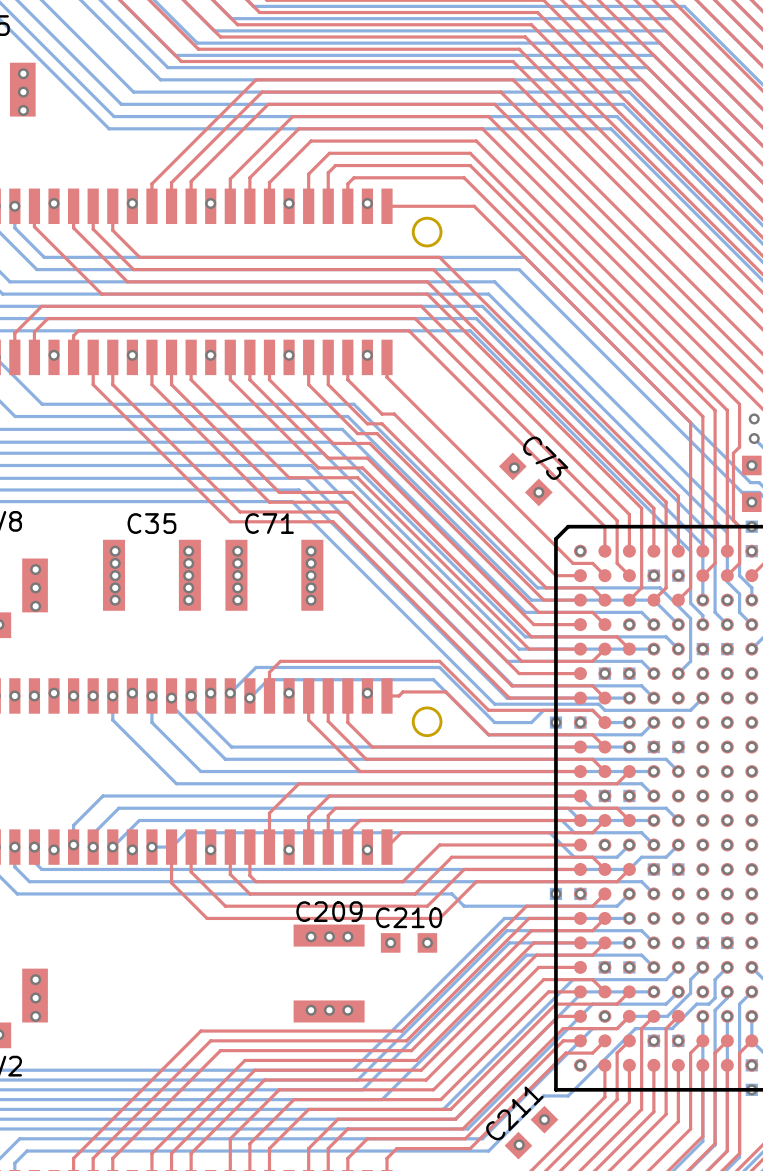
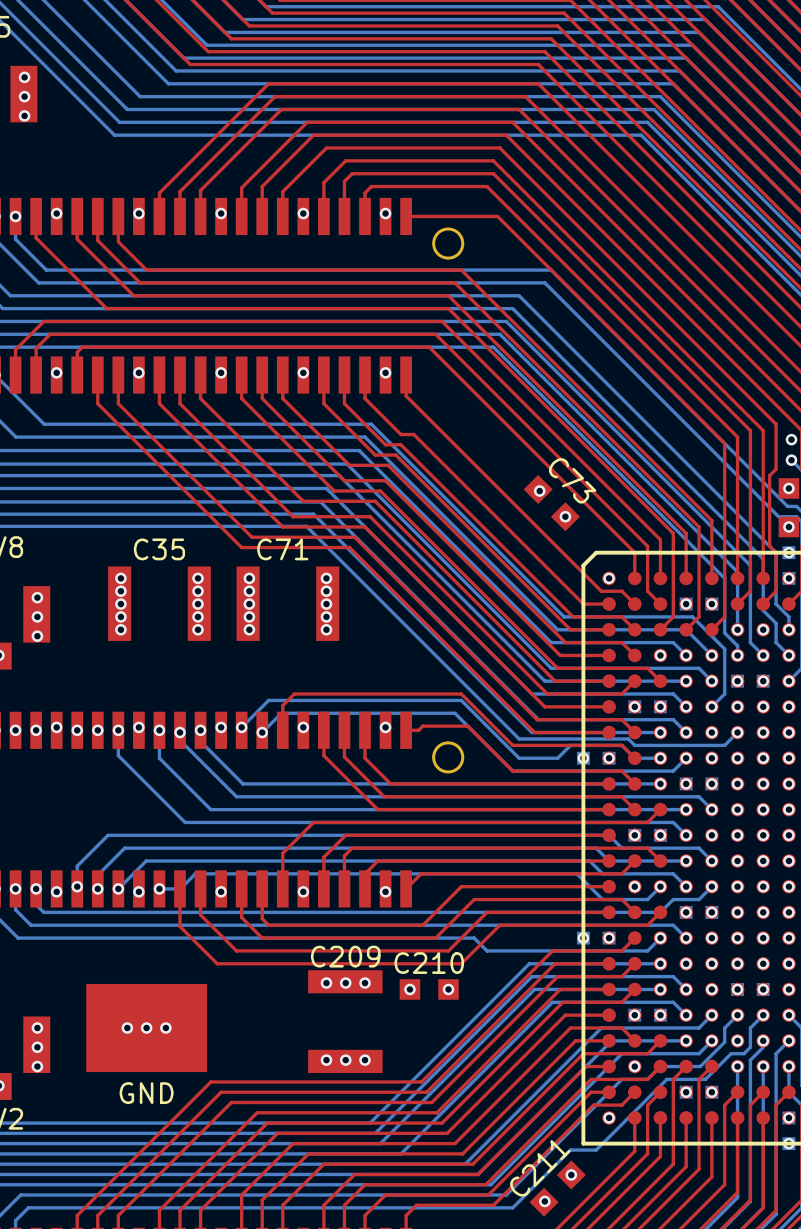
via: none -> (127, 1028)
part: none -> (146, 1028)
via: none -> (146, 1028)
via: none -> (165, 1028)
text: none -> GND (146, 1093)

